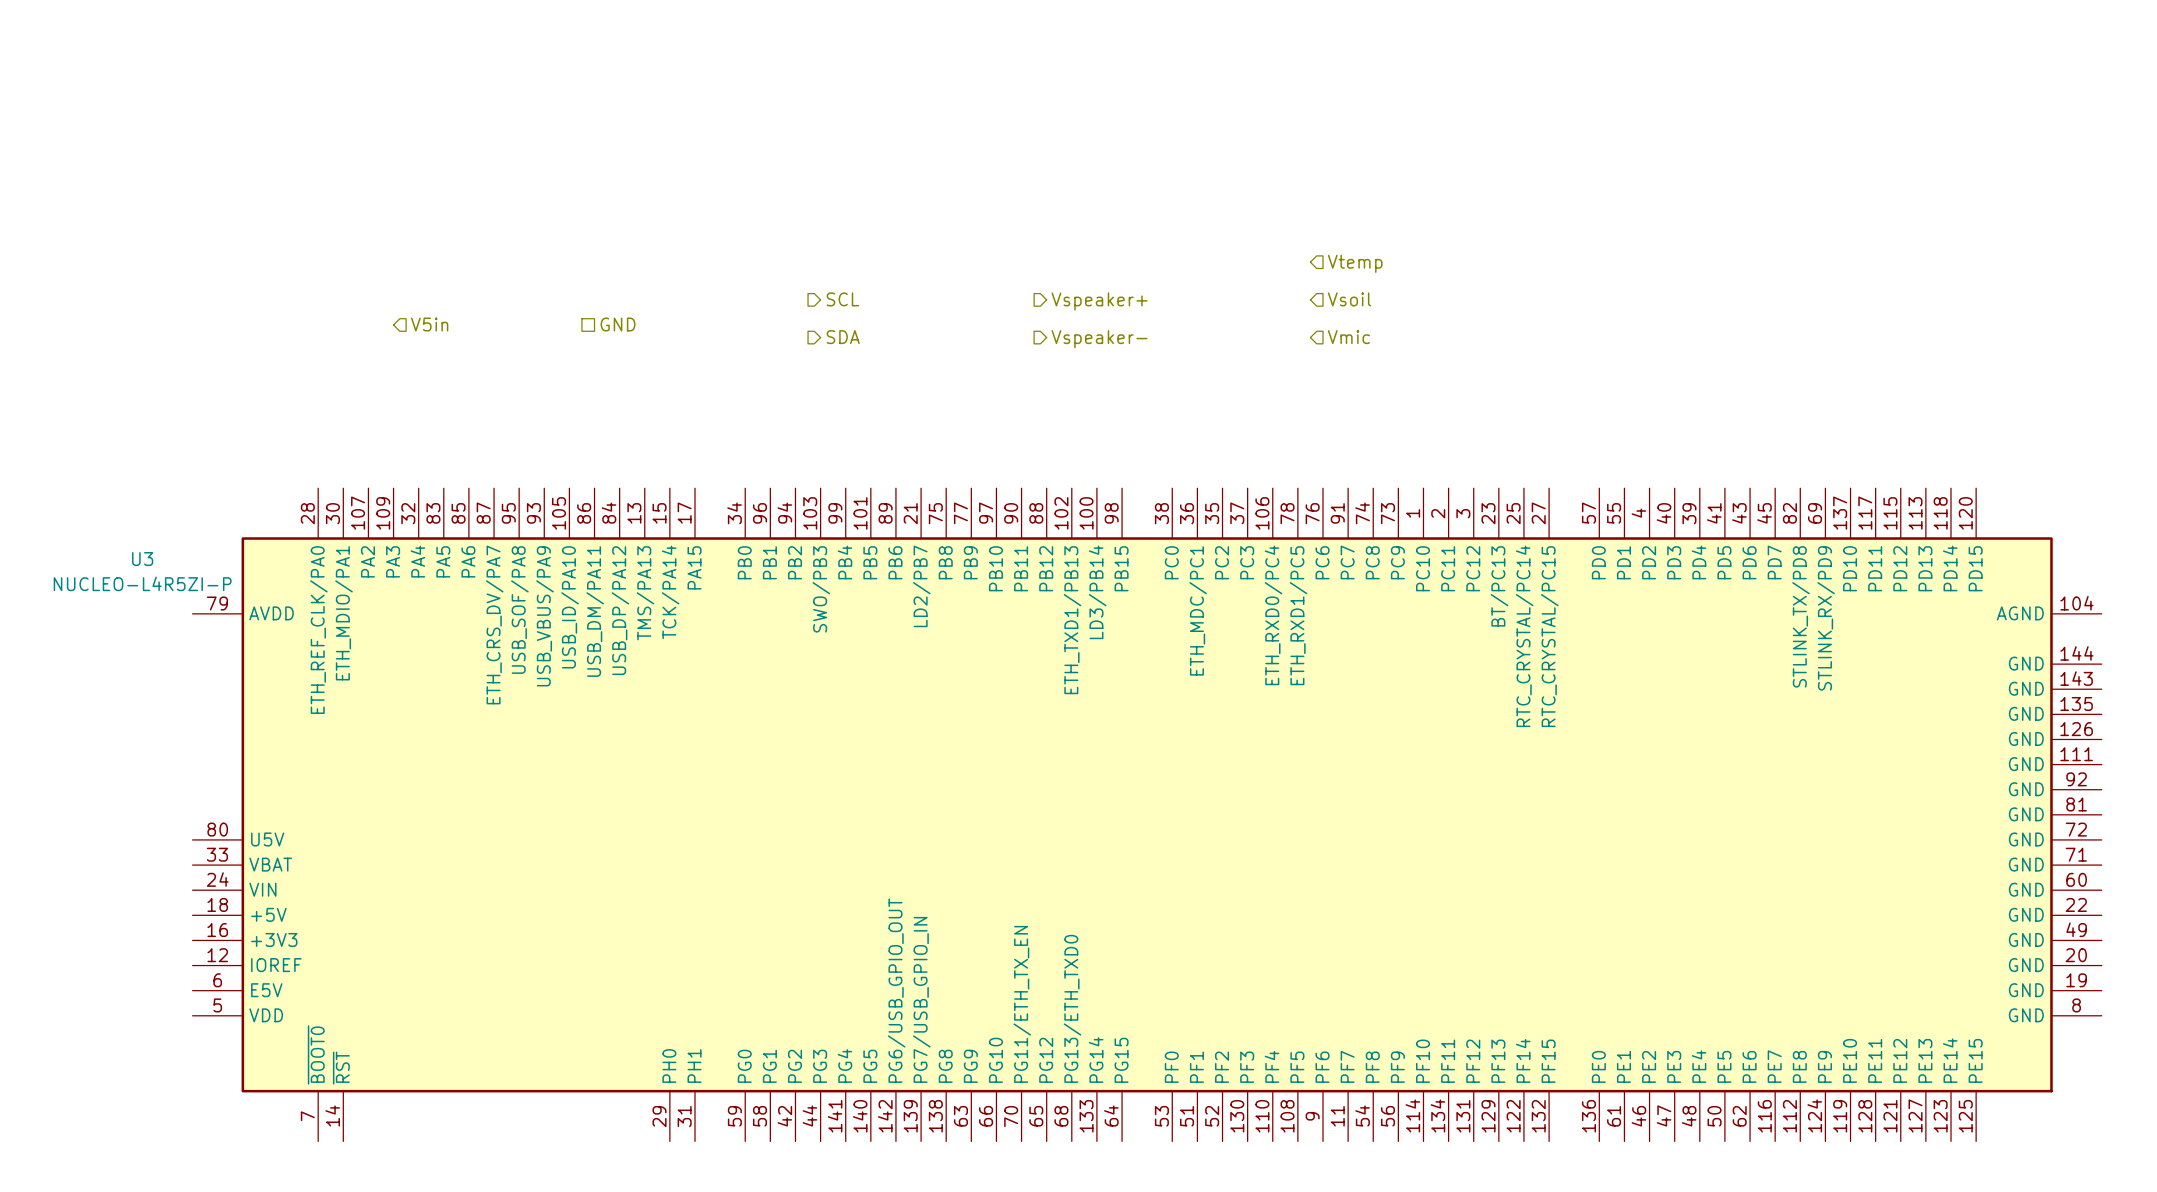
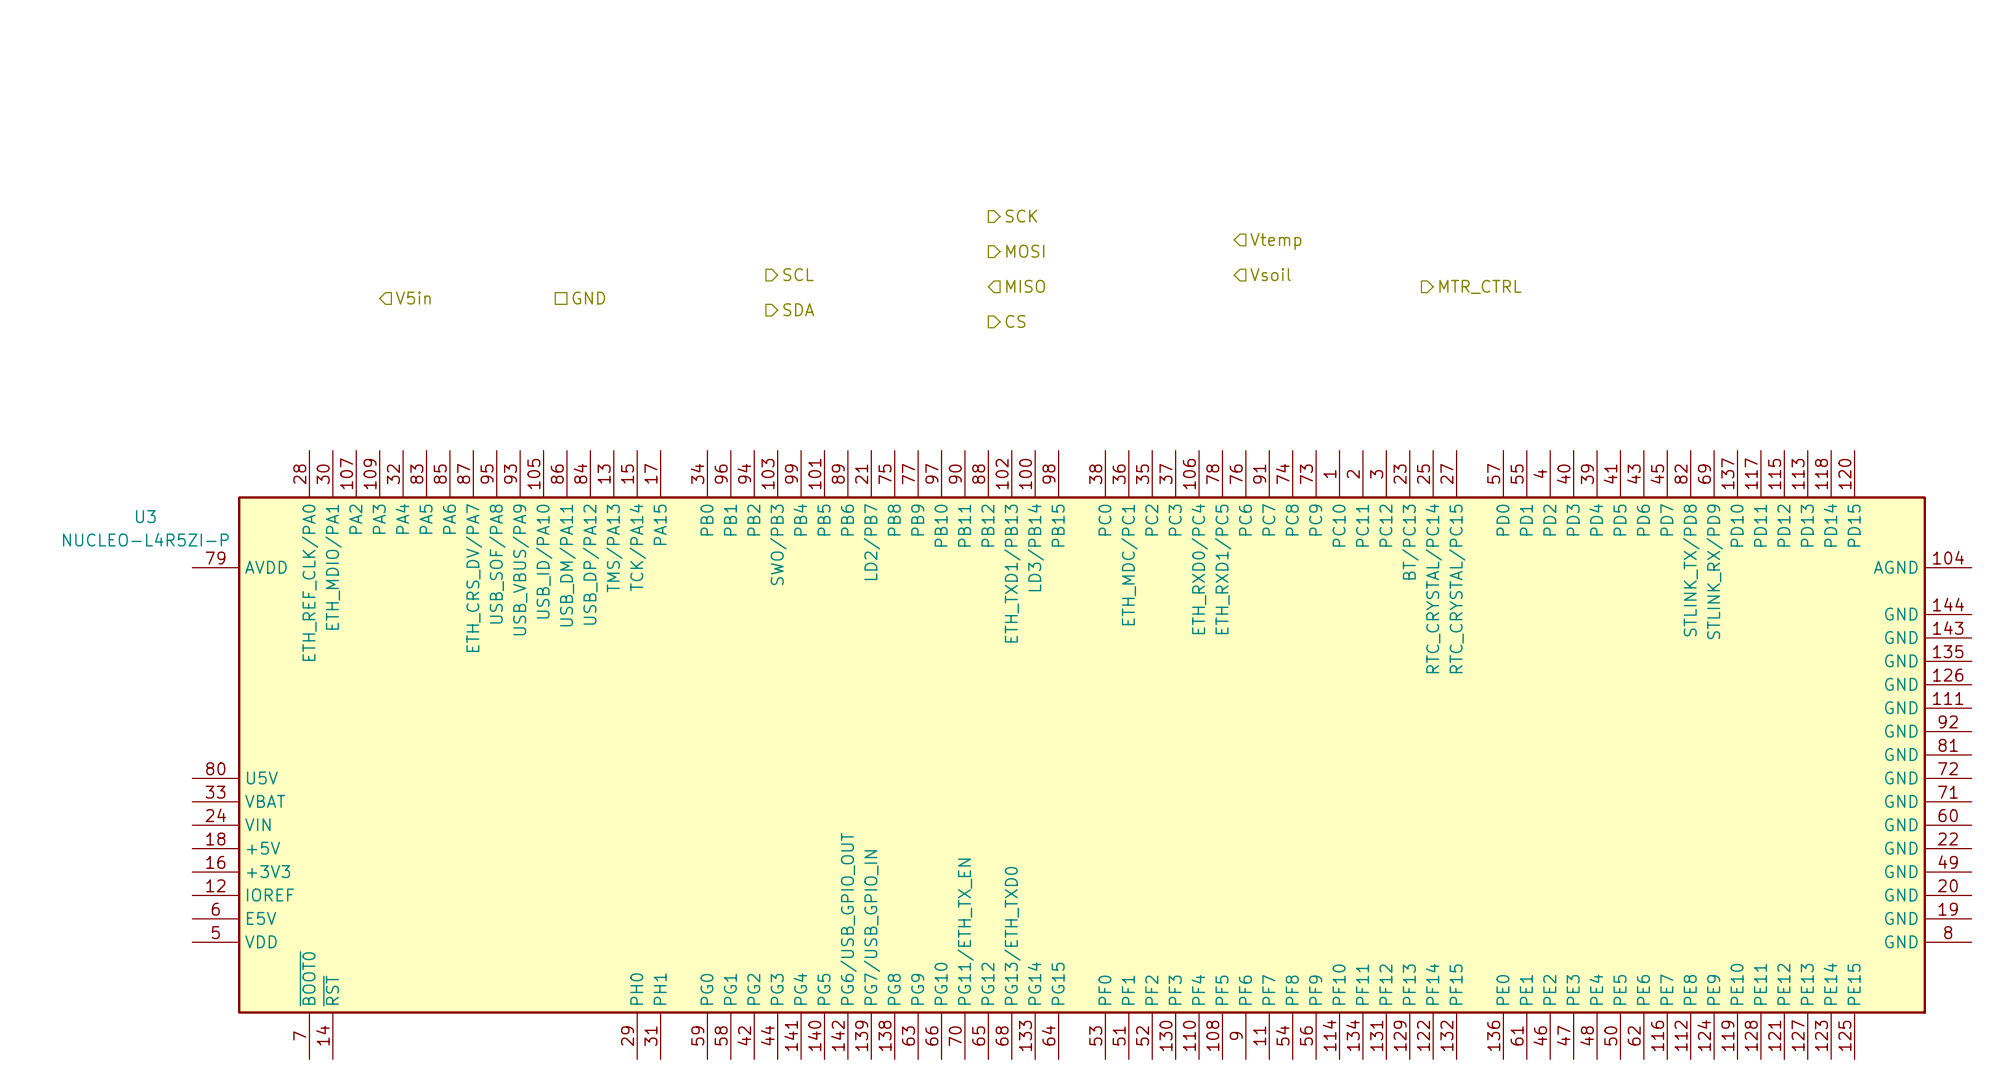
hierarchical label: none -> SCK (1021, 216)
hierarchical label: none -> MOSI (1025, 251)
hierarchical label: Vspeaker+ (1099, 301) -> none
hierarchical label: none -> MISO (1025, 286)
hierarchical label: none -> MTR_CTRL (1480, 286)
hierarchical label: Vmic (1348, 337) -> none
hierarchical label: Vspeaker- (1099, 339) -> none
hierarchical label: none -> CS (1015, 321)

